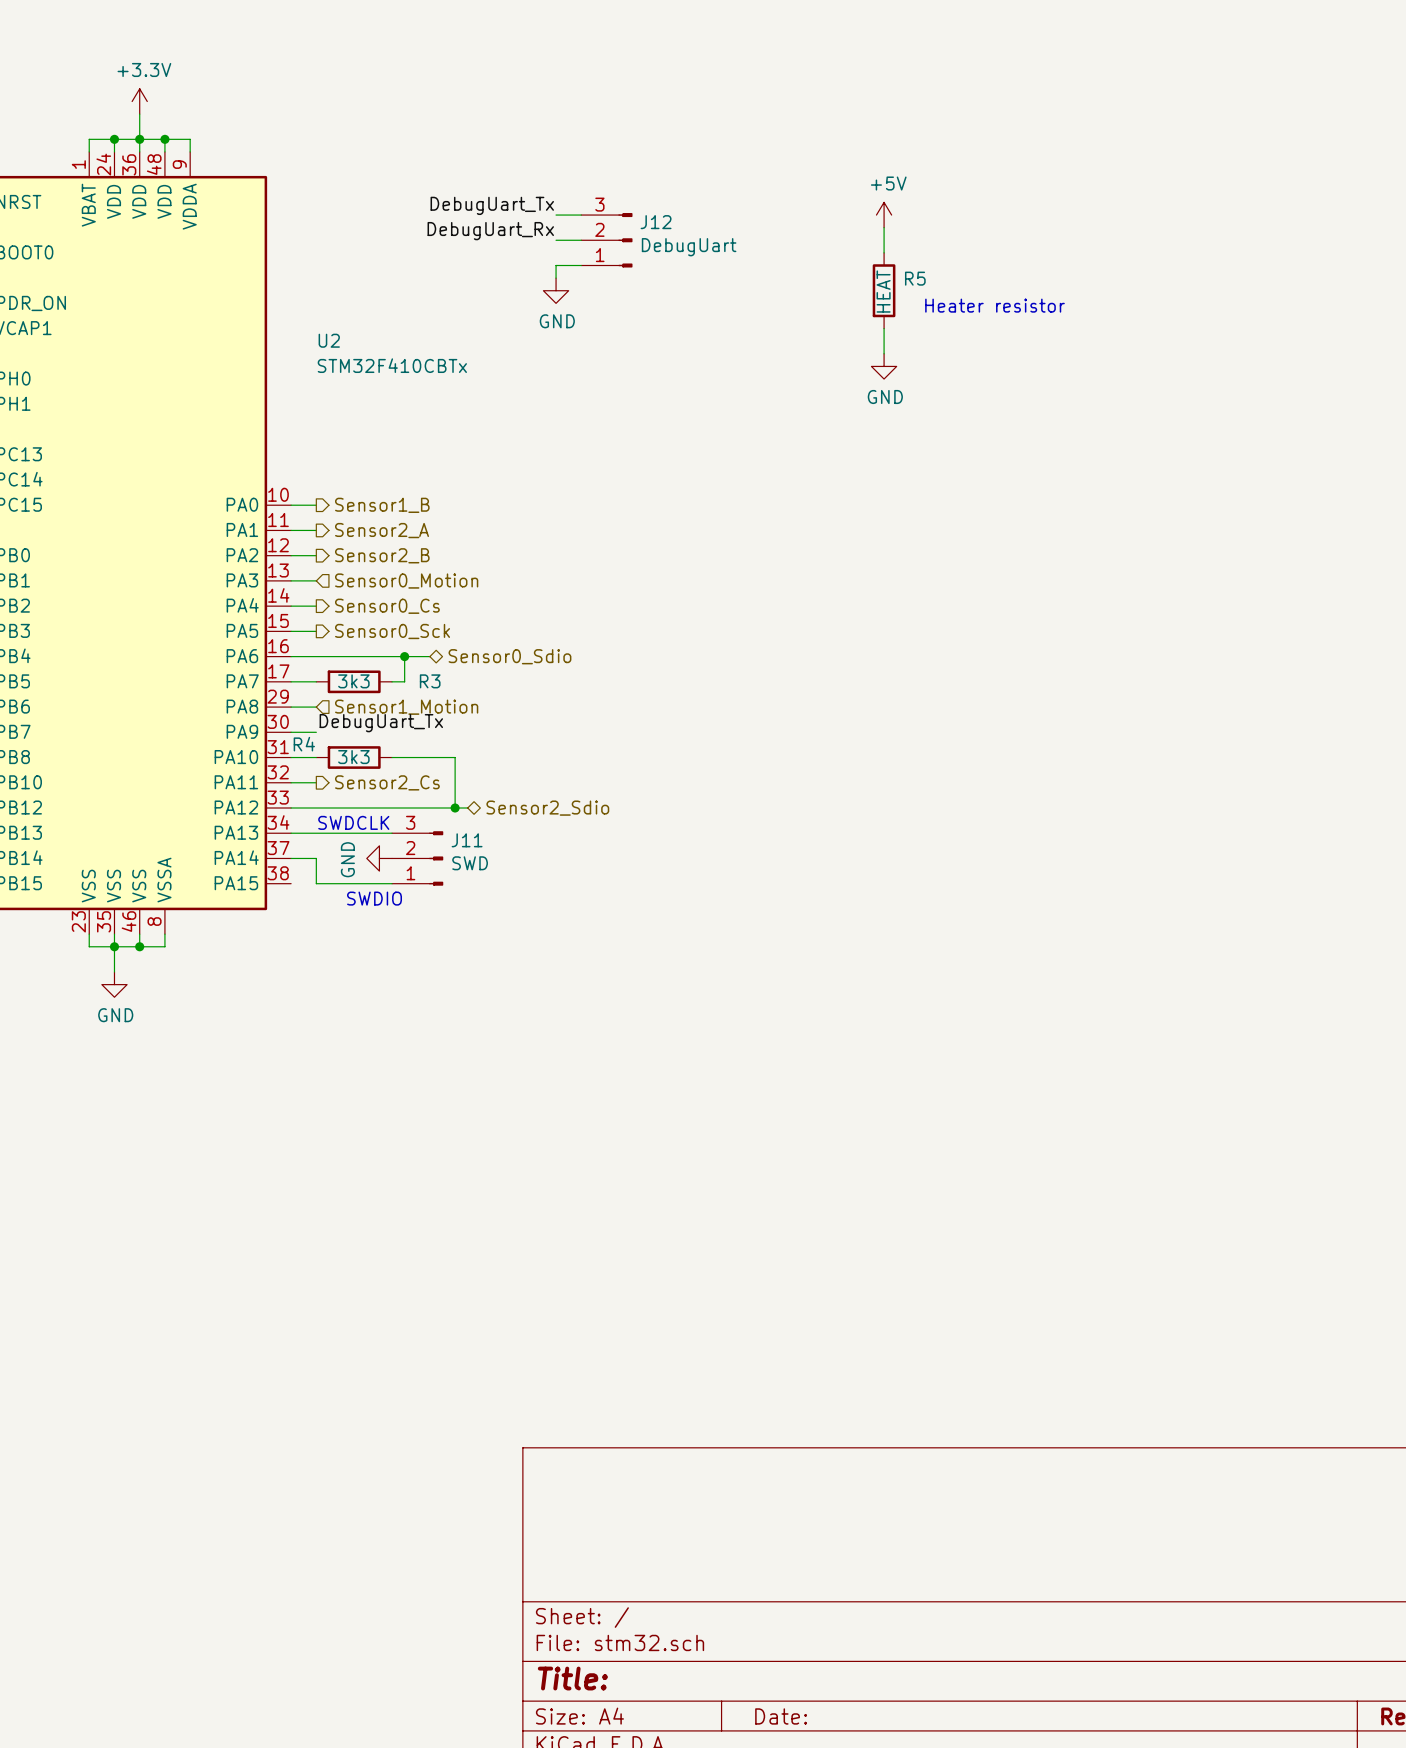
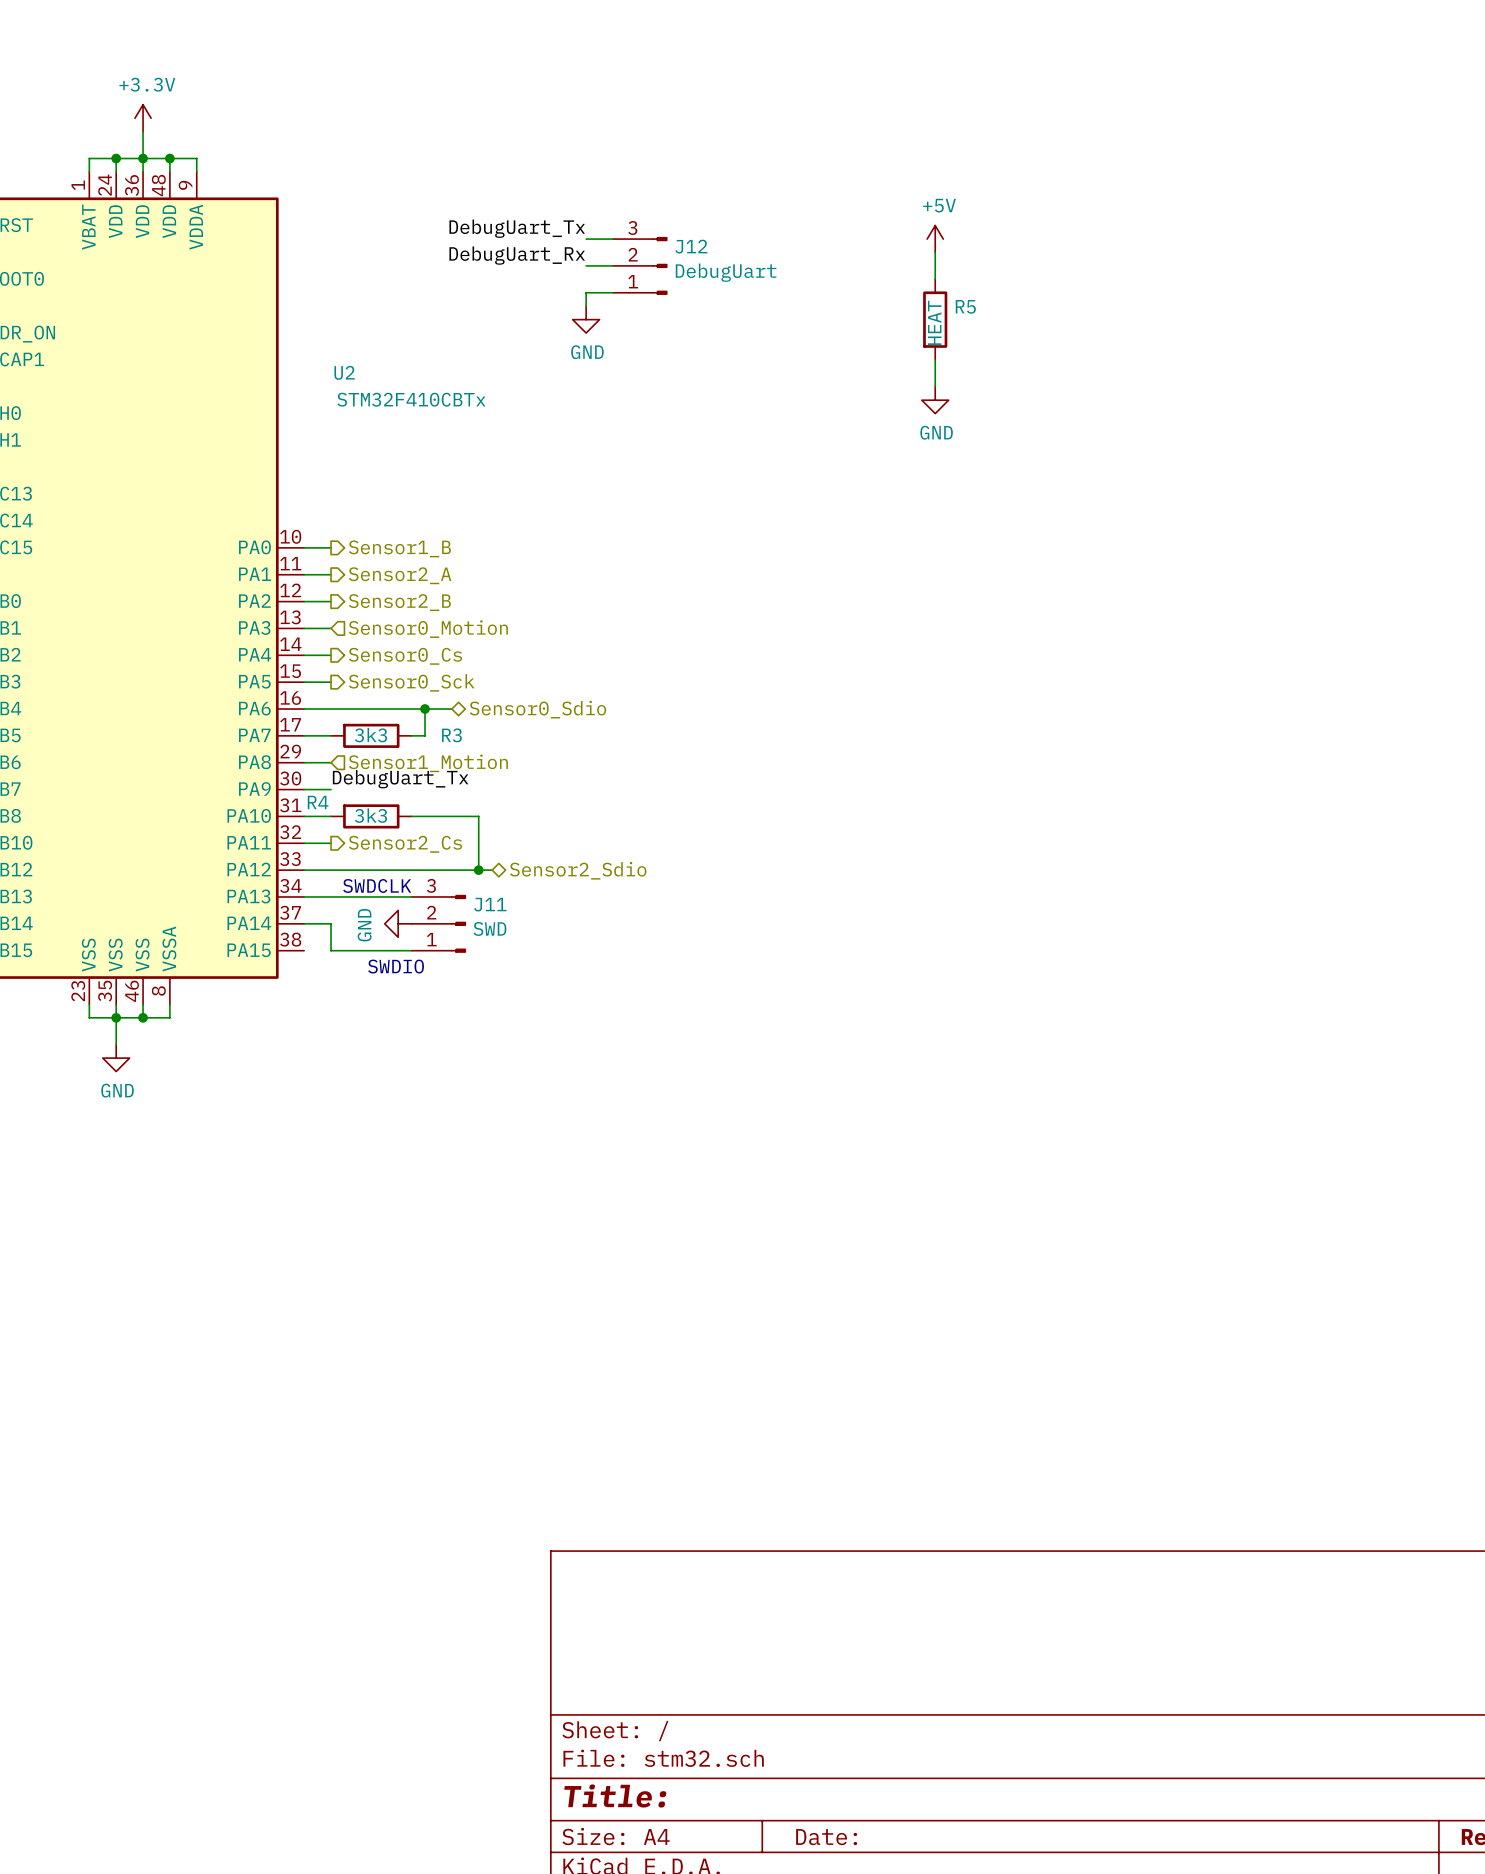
text: Heater resistor (995, 305) -> none

